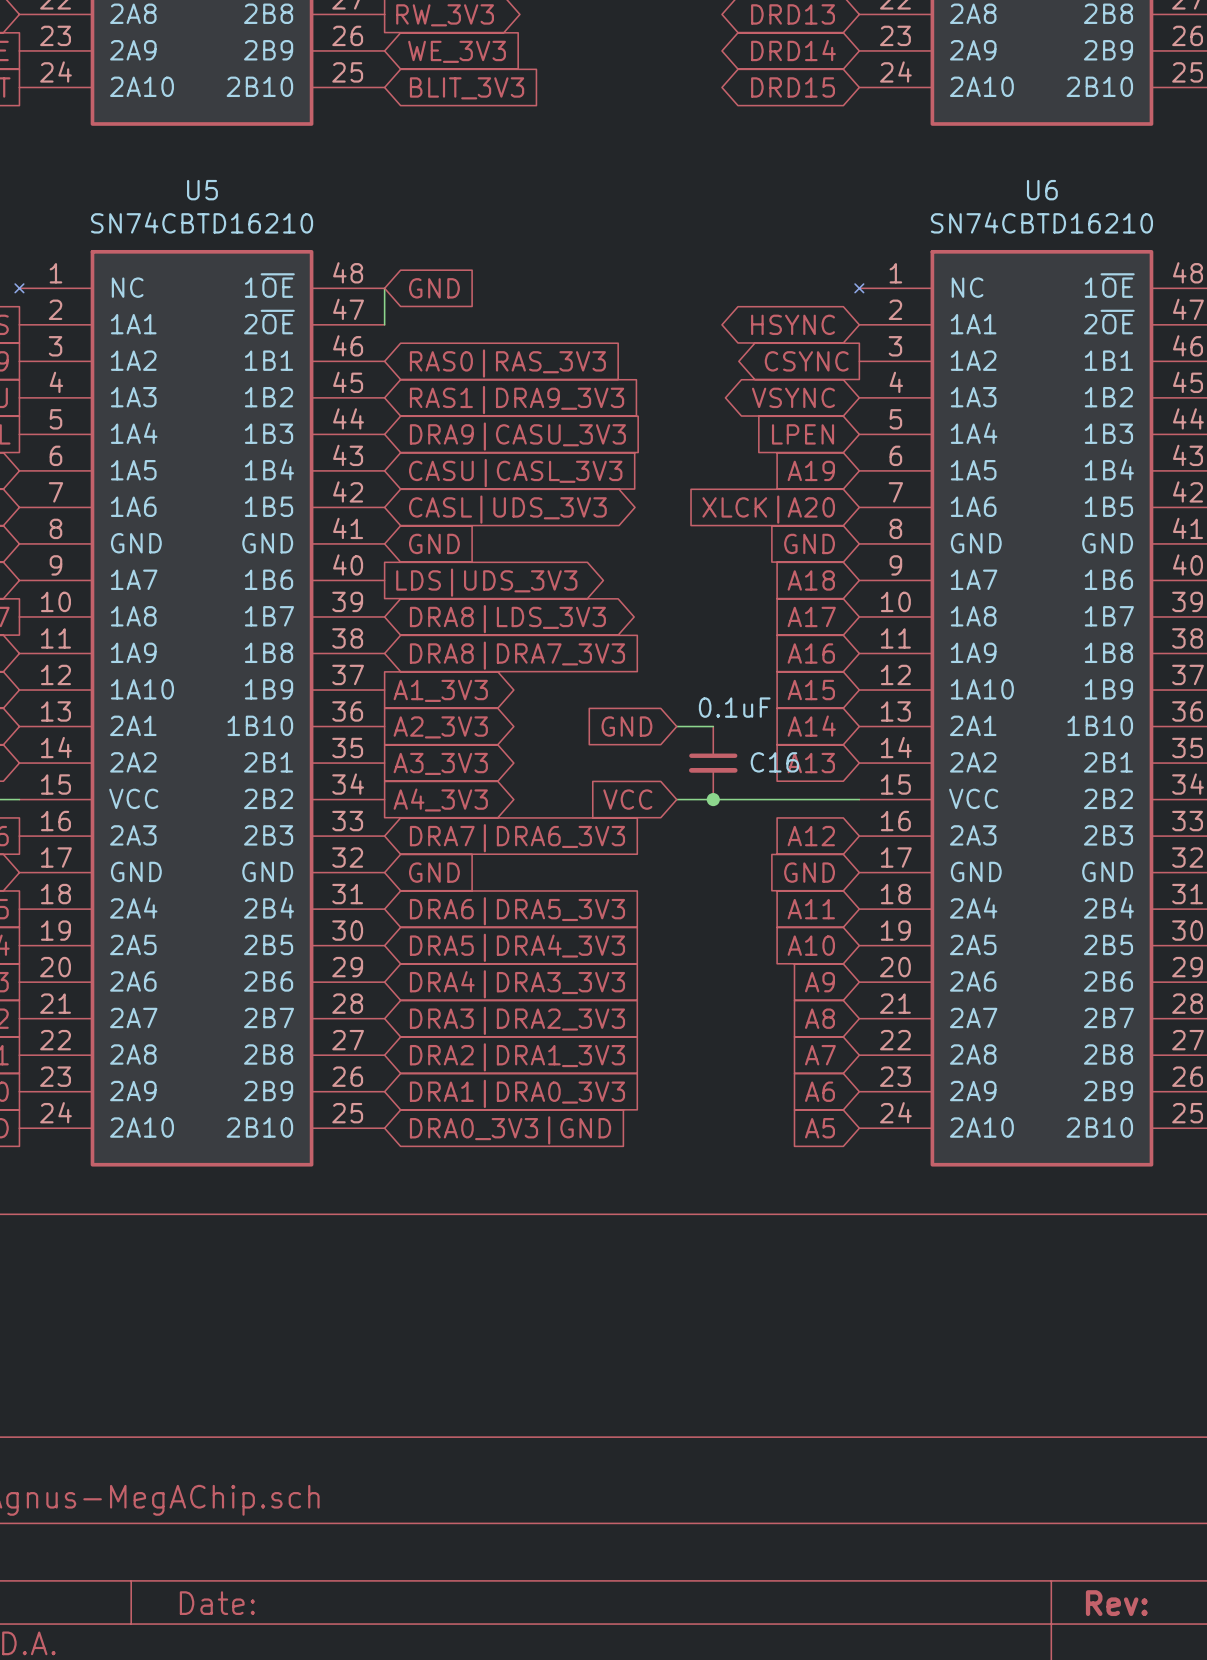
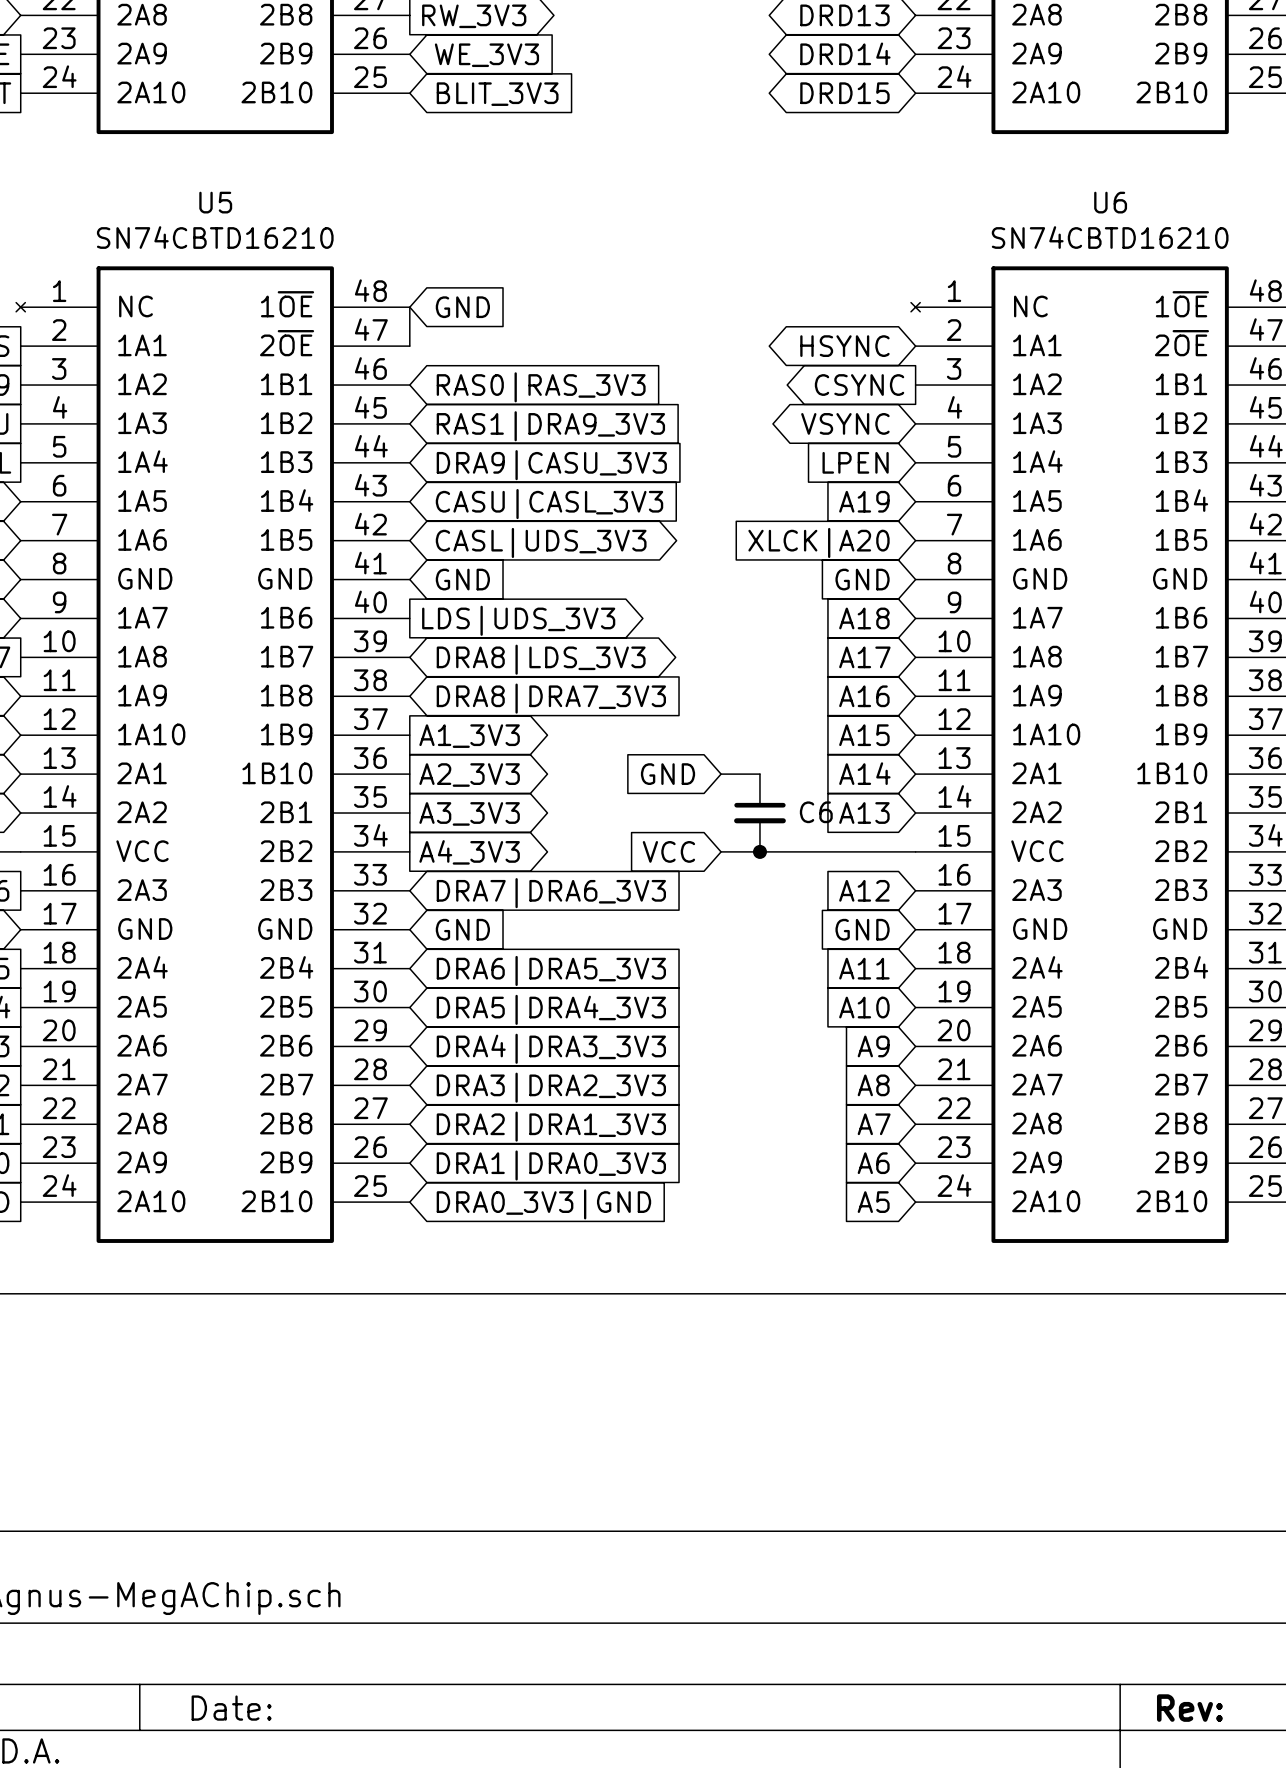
C16 value: 0.1uF (734, 707) -> none
C16 name: C16 (774, 762) -> C6 (816, 812)

